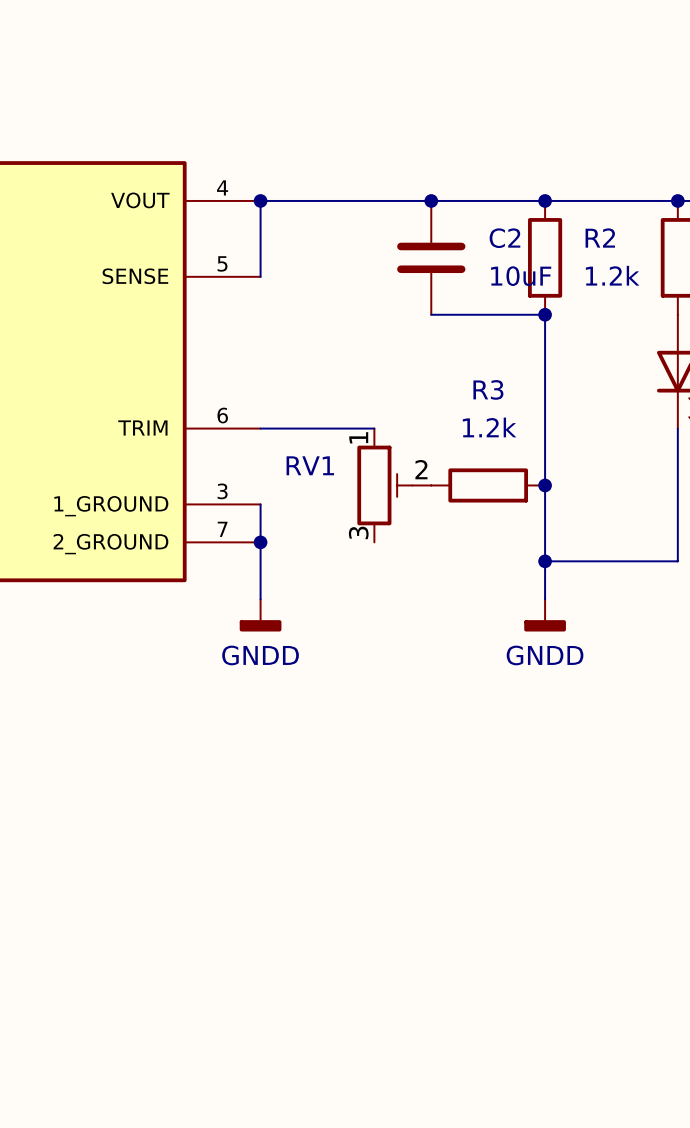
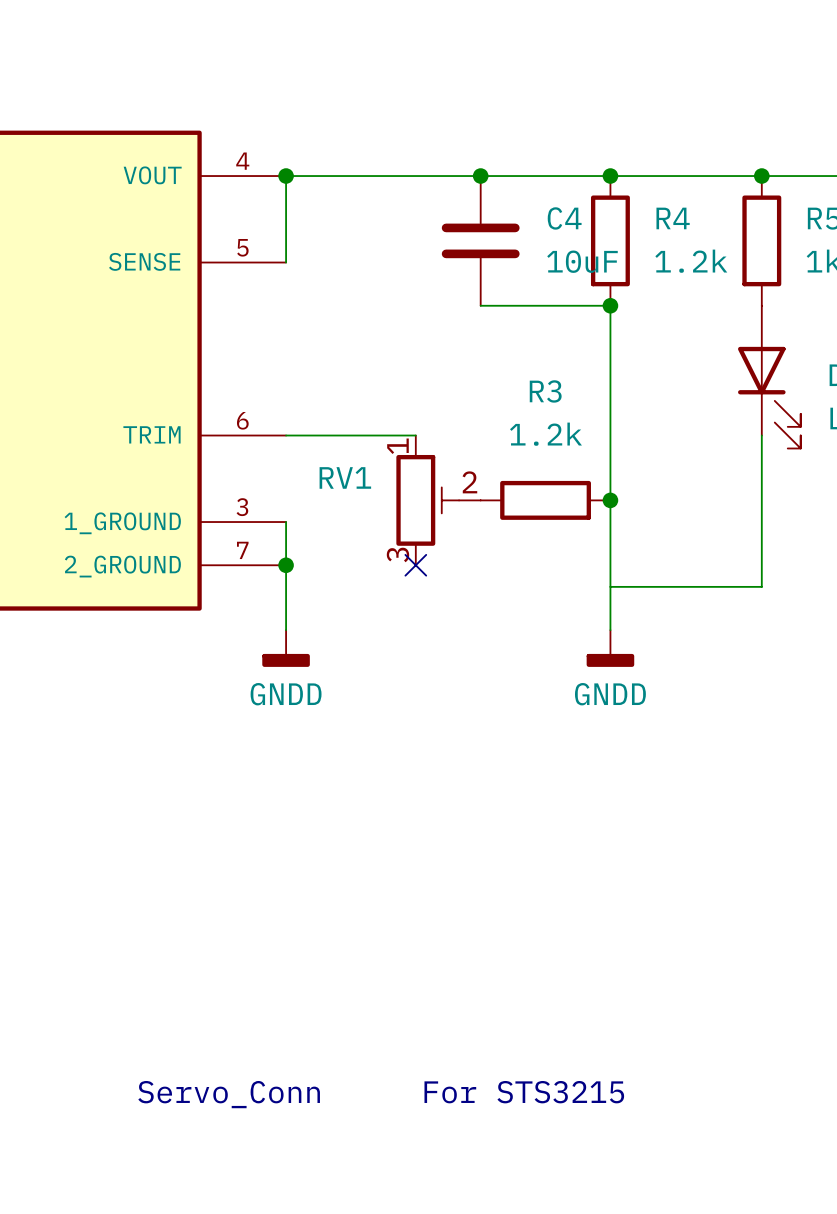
C2 name: C2 (504, 238) -> C4 (564, 218)
R2 name: R2 (600, 238) -> R4 (673, 218)
no-connect mark: none -> (415, 565)
junction: (545, 561) -> none
text: none -> For STS3215 (524, 1092)
text: none -> Servo_Conn (229, 1094)

